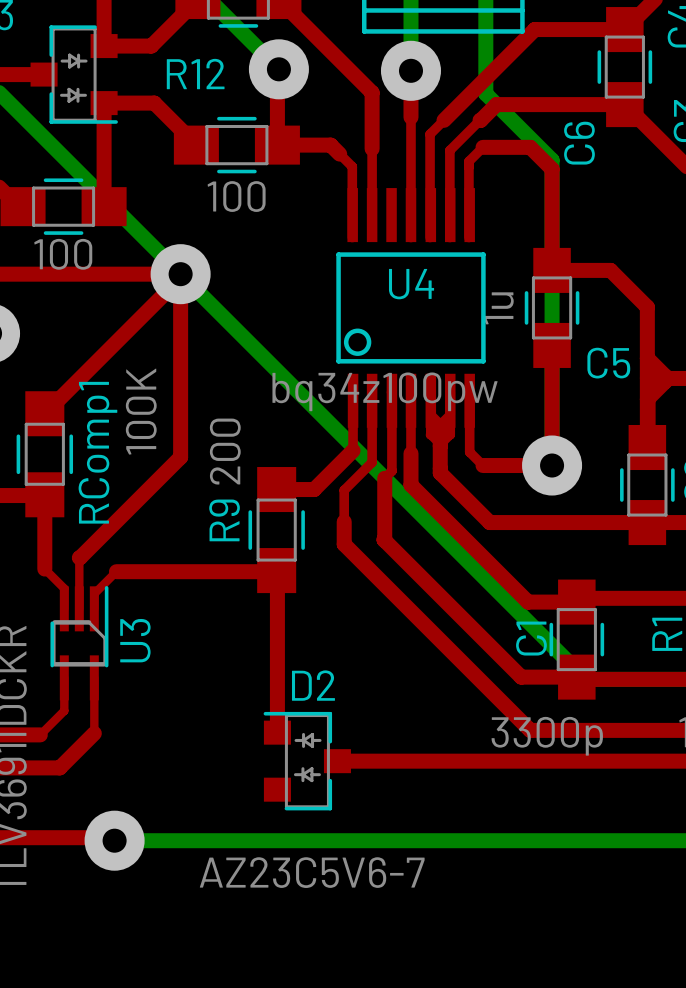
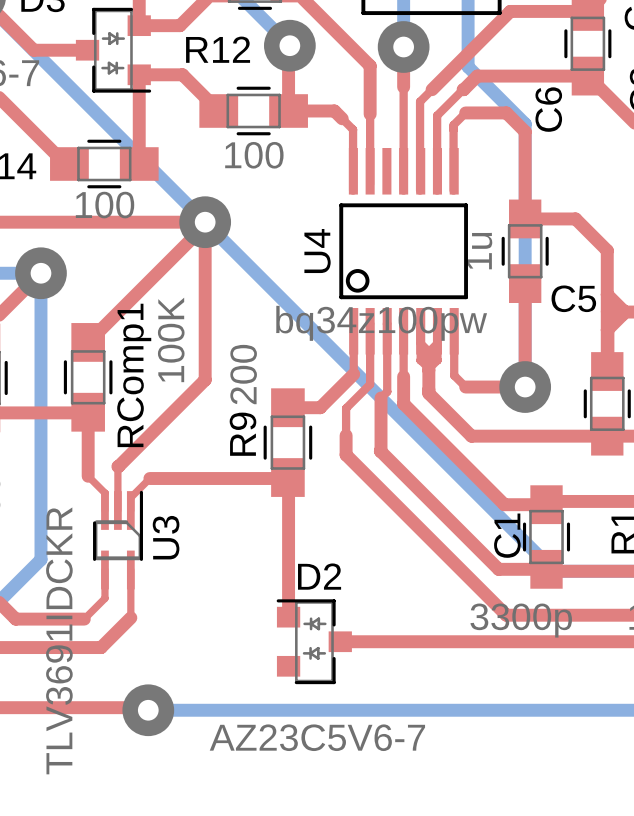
U4 name rotation: 0° (411, 284) -> 90° counterclockwise (317, 251)
U4 name position: U4 (411, 284) -> U4 (317, 251)

